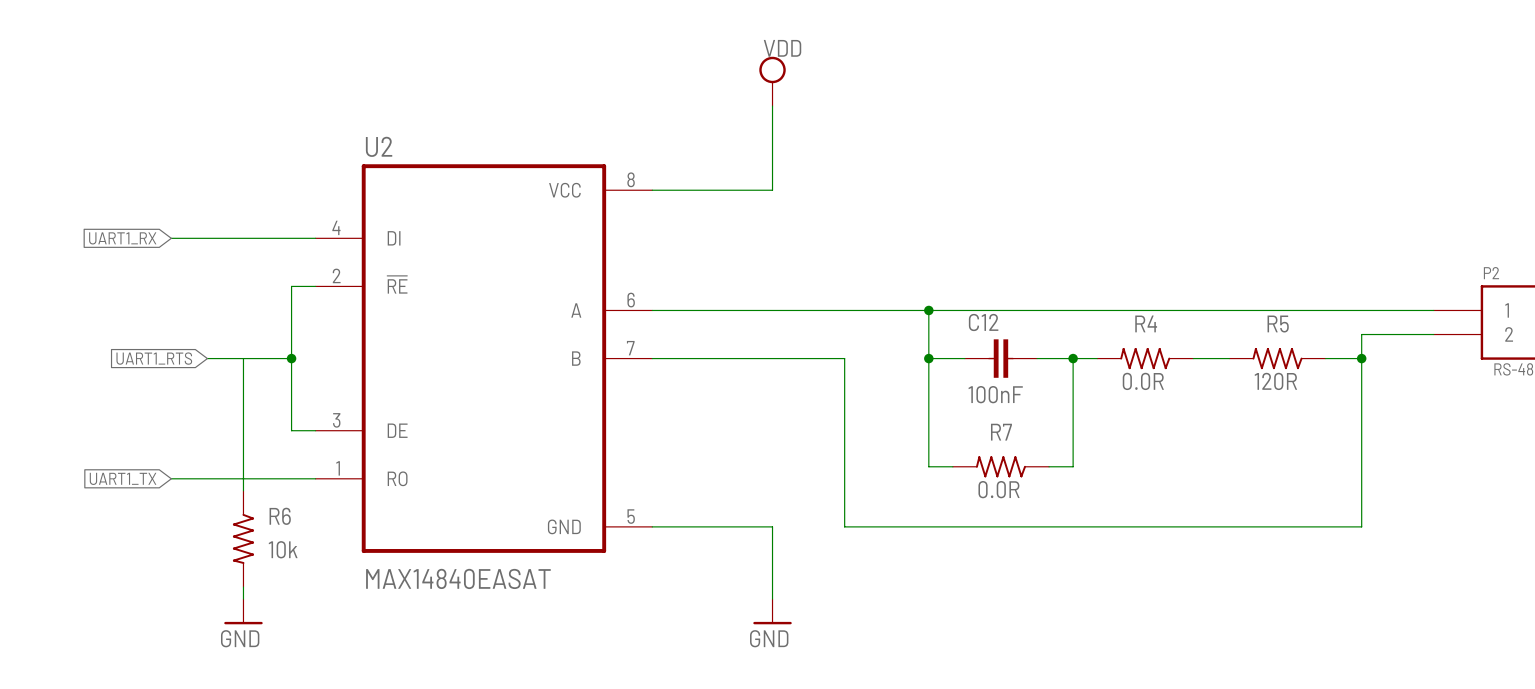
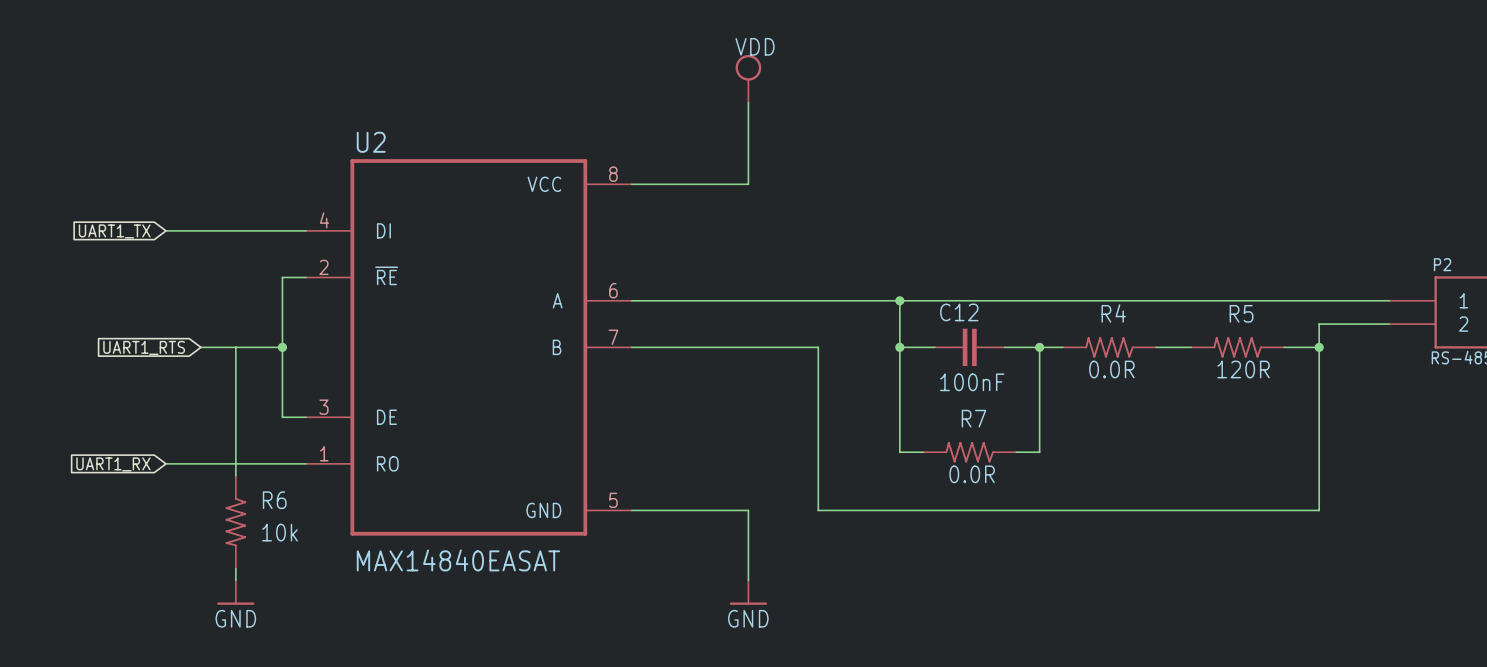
global label: UART1_RX (122, 238) -> UART1_TX (114, 231)
global label: UART1_TX (123, 478) -> UART1_RX (113, 464)

